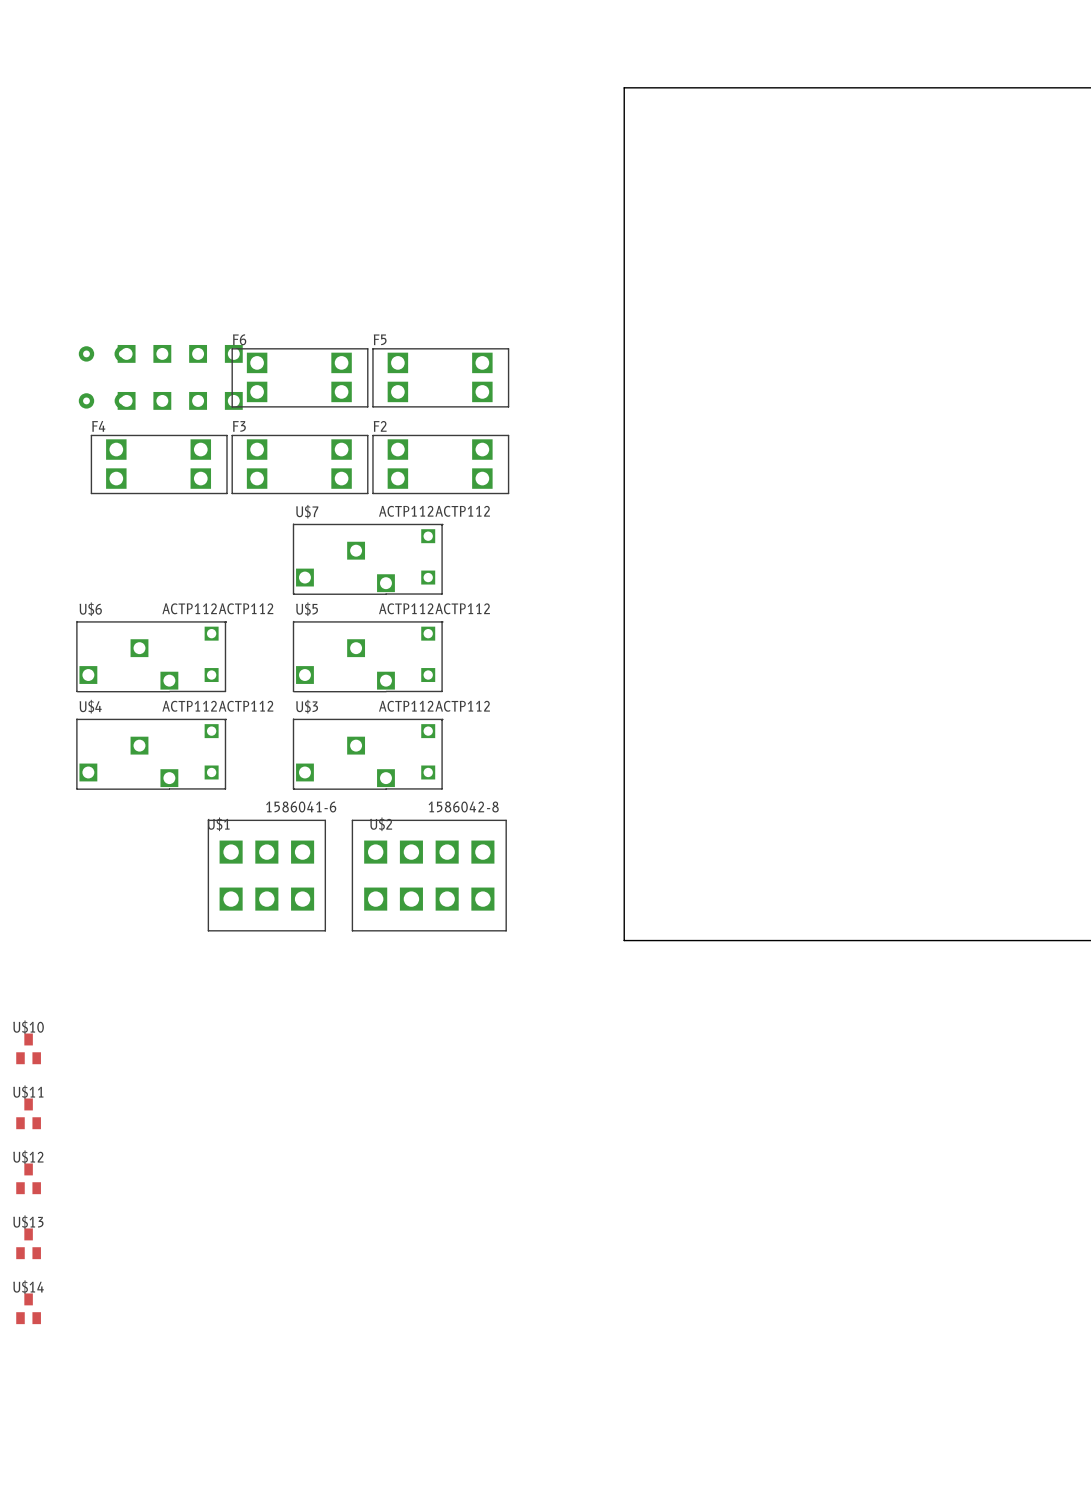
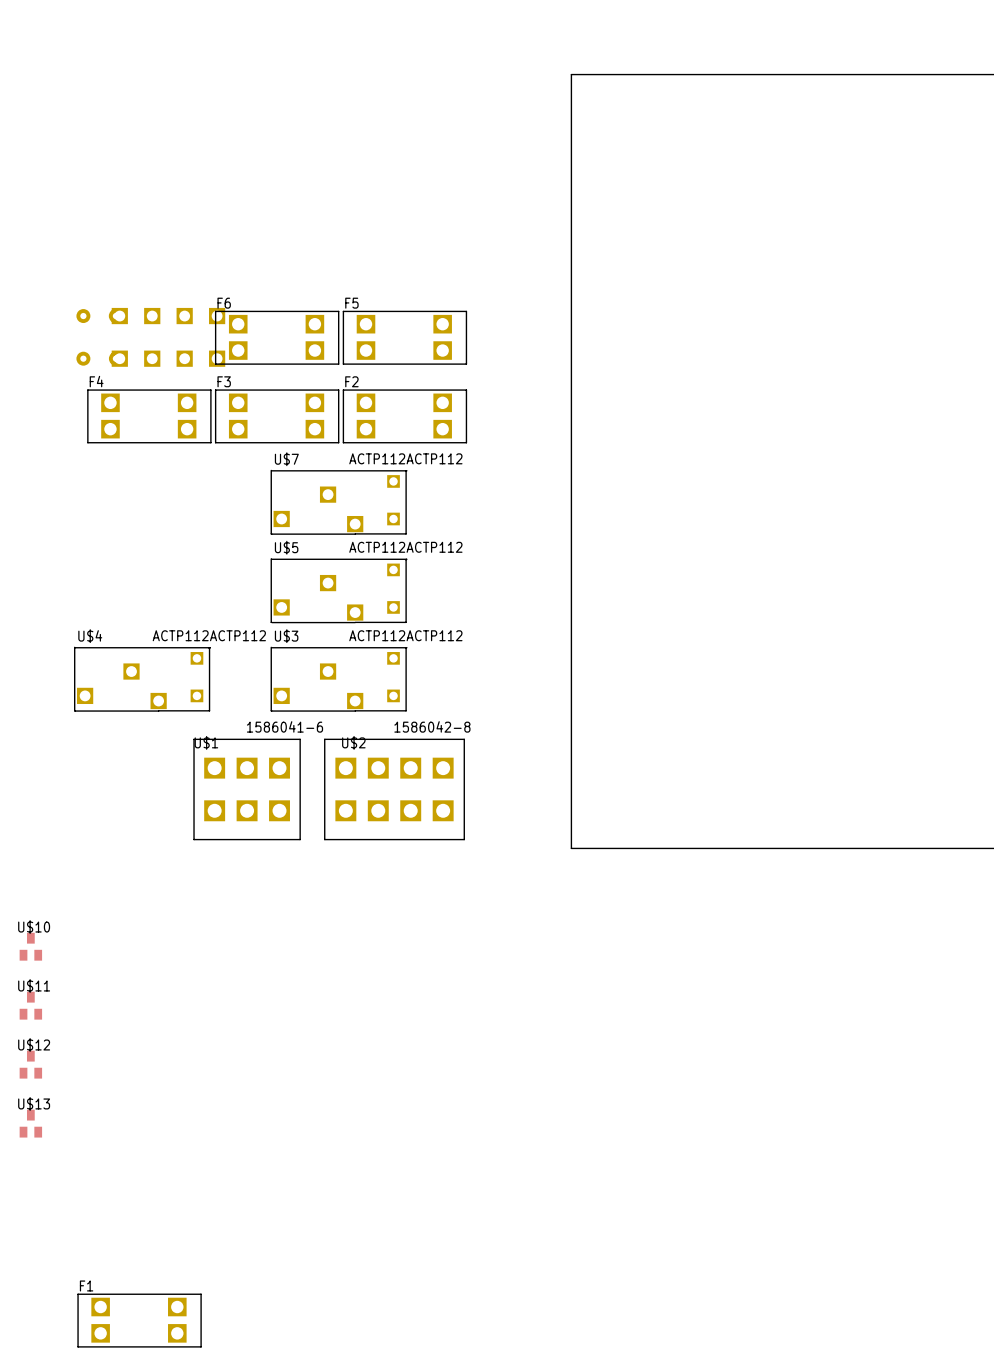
U$6: ACTP112ACTP112 (151, 656) -> none
U$14: (28, 1308) -> none
F1: none -> (139, 1320)

